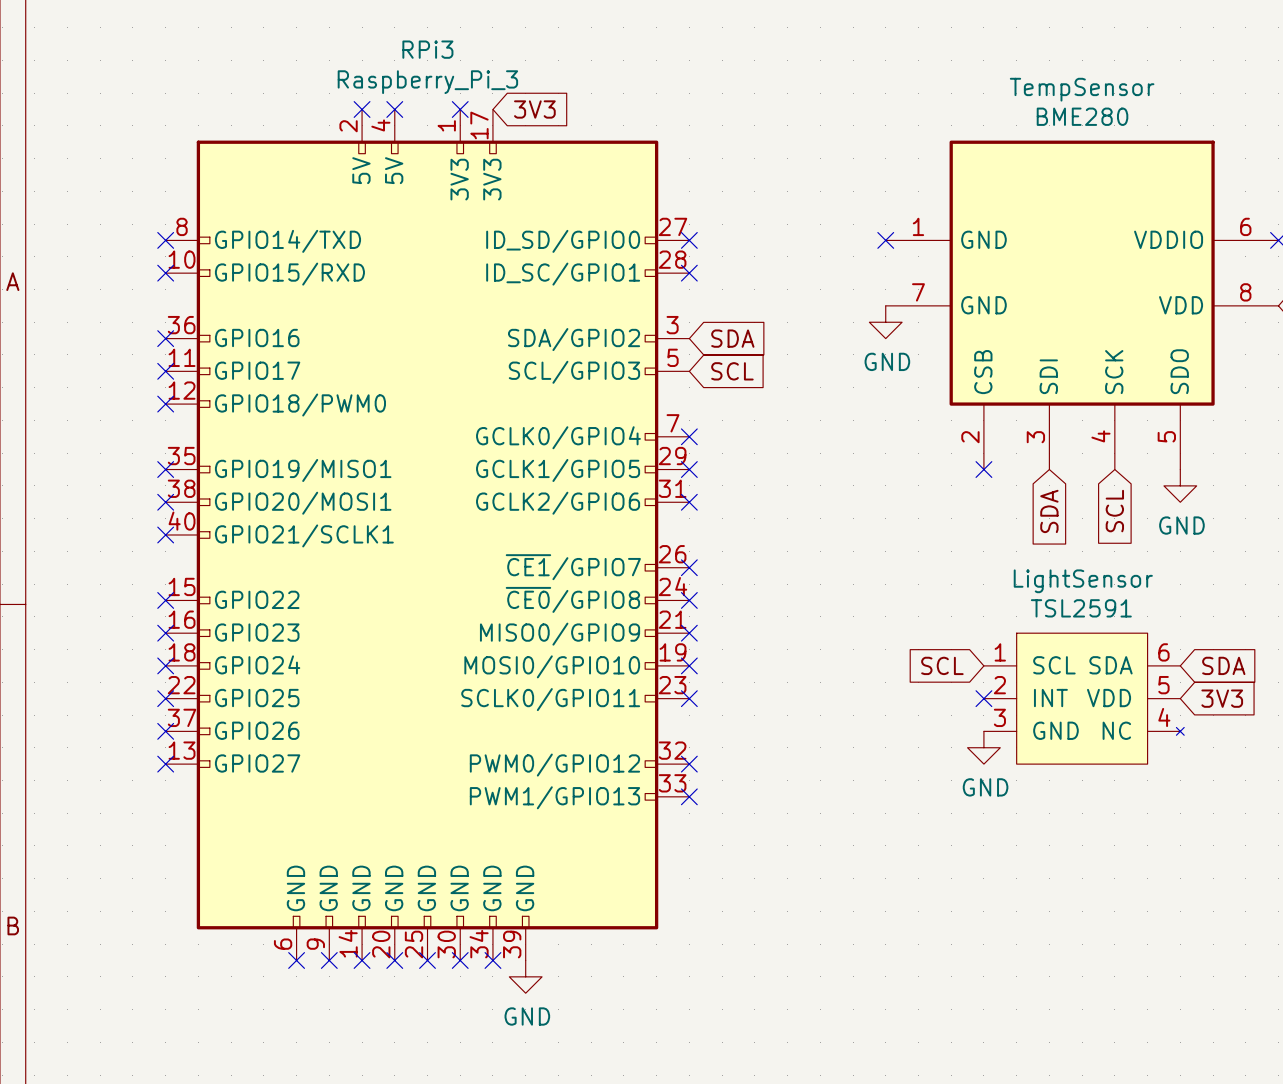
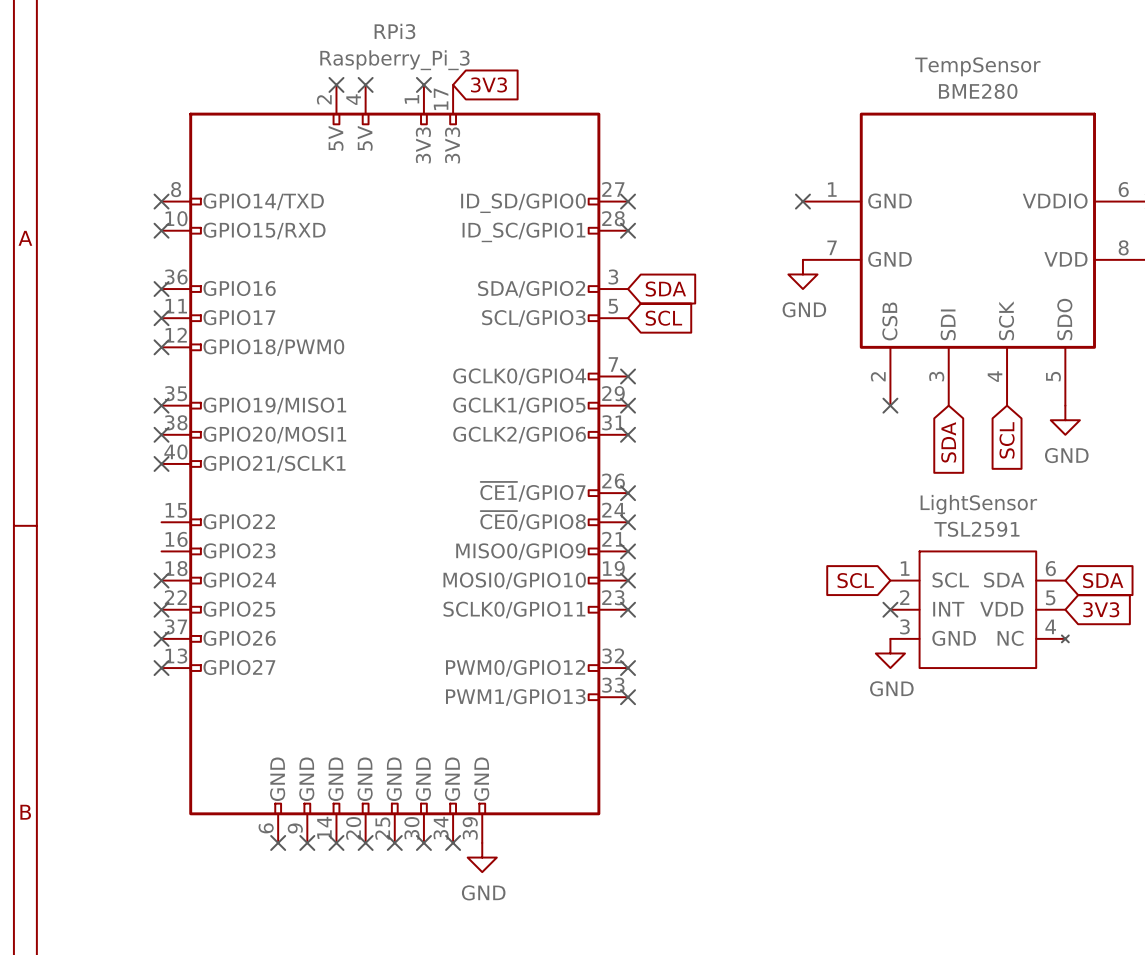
no-connect mark: (165, 600) -> none
no-connect mark: (165, 633) -> none

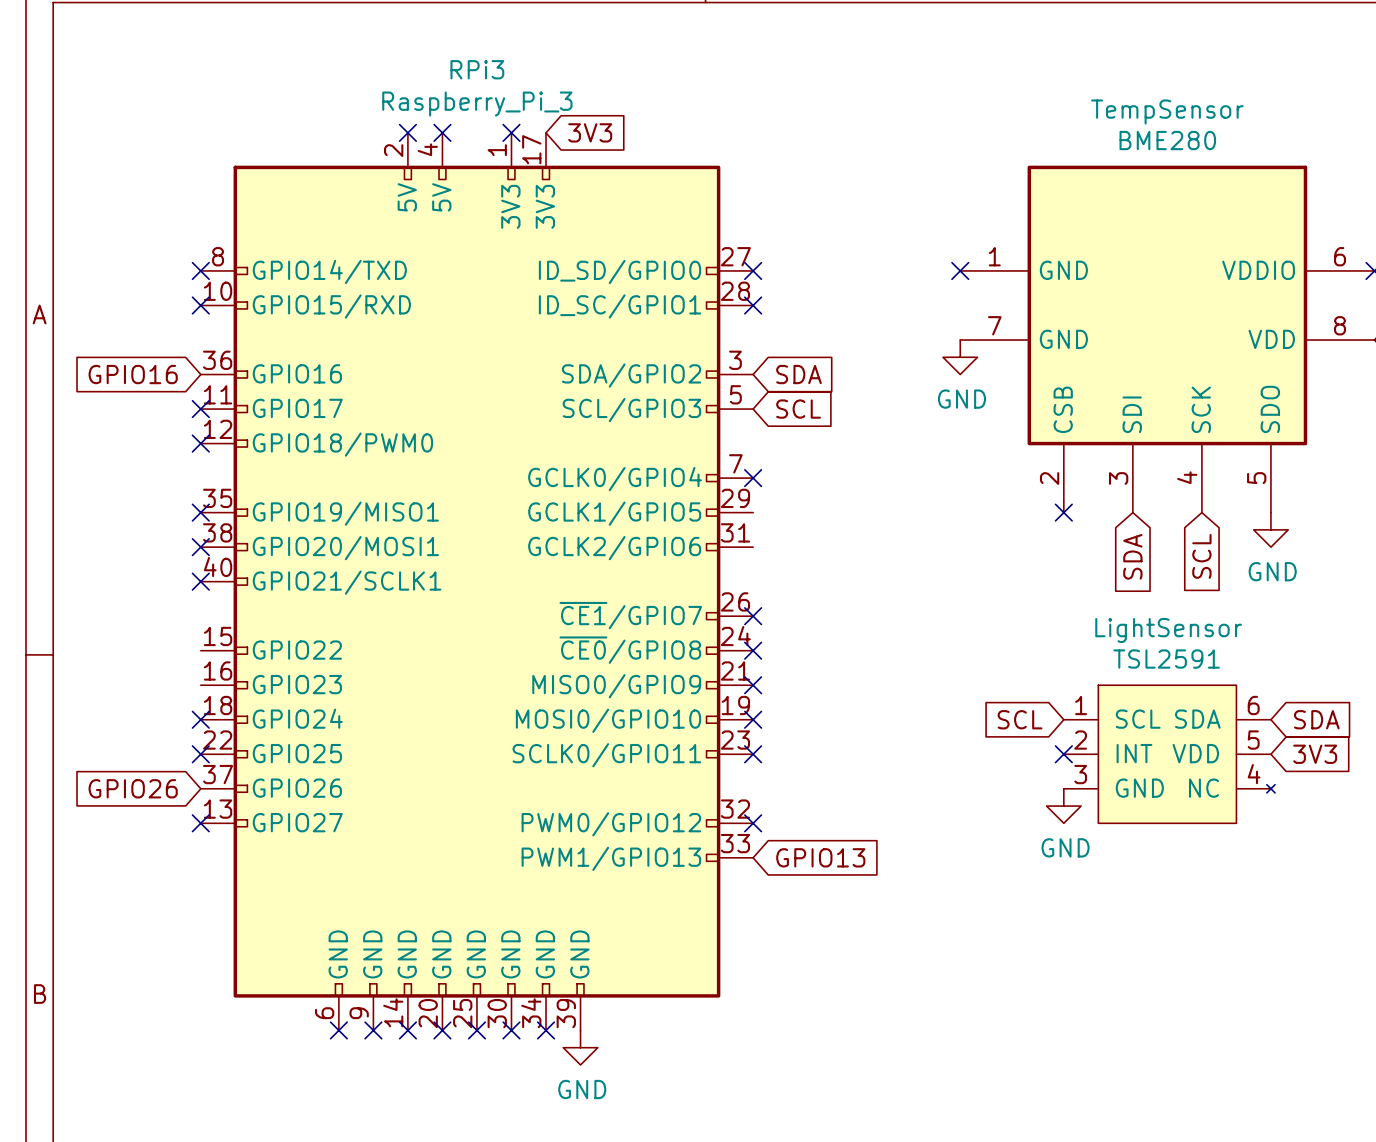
global label: none -> GPIO16 (133, 374)
no-connect mark: (161, 289) -> none
no-connect mark: (628, 405) -> none
no-connect mark: (628, 434) -> none
global label: none -> GPIO26 (133, 788)
no-connect mark: (161, 638) -> none
no-connect mark: (628, 697) -> none
global label: none -> GPIO13 (820, 857)

